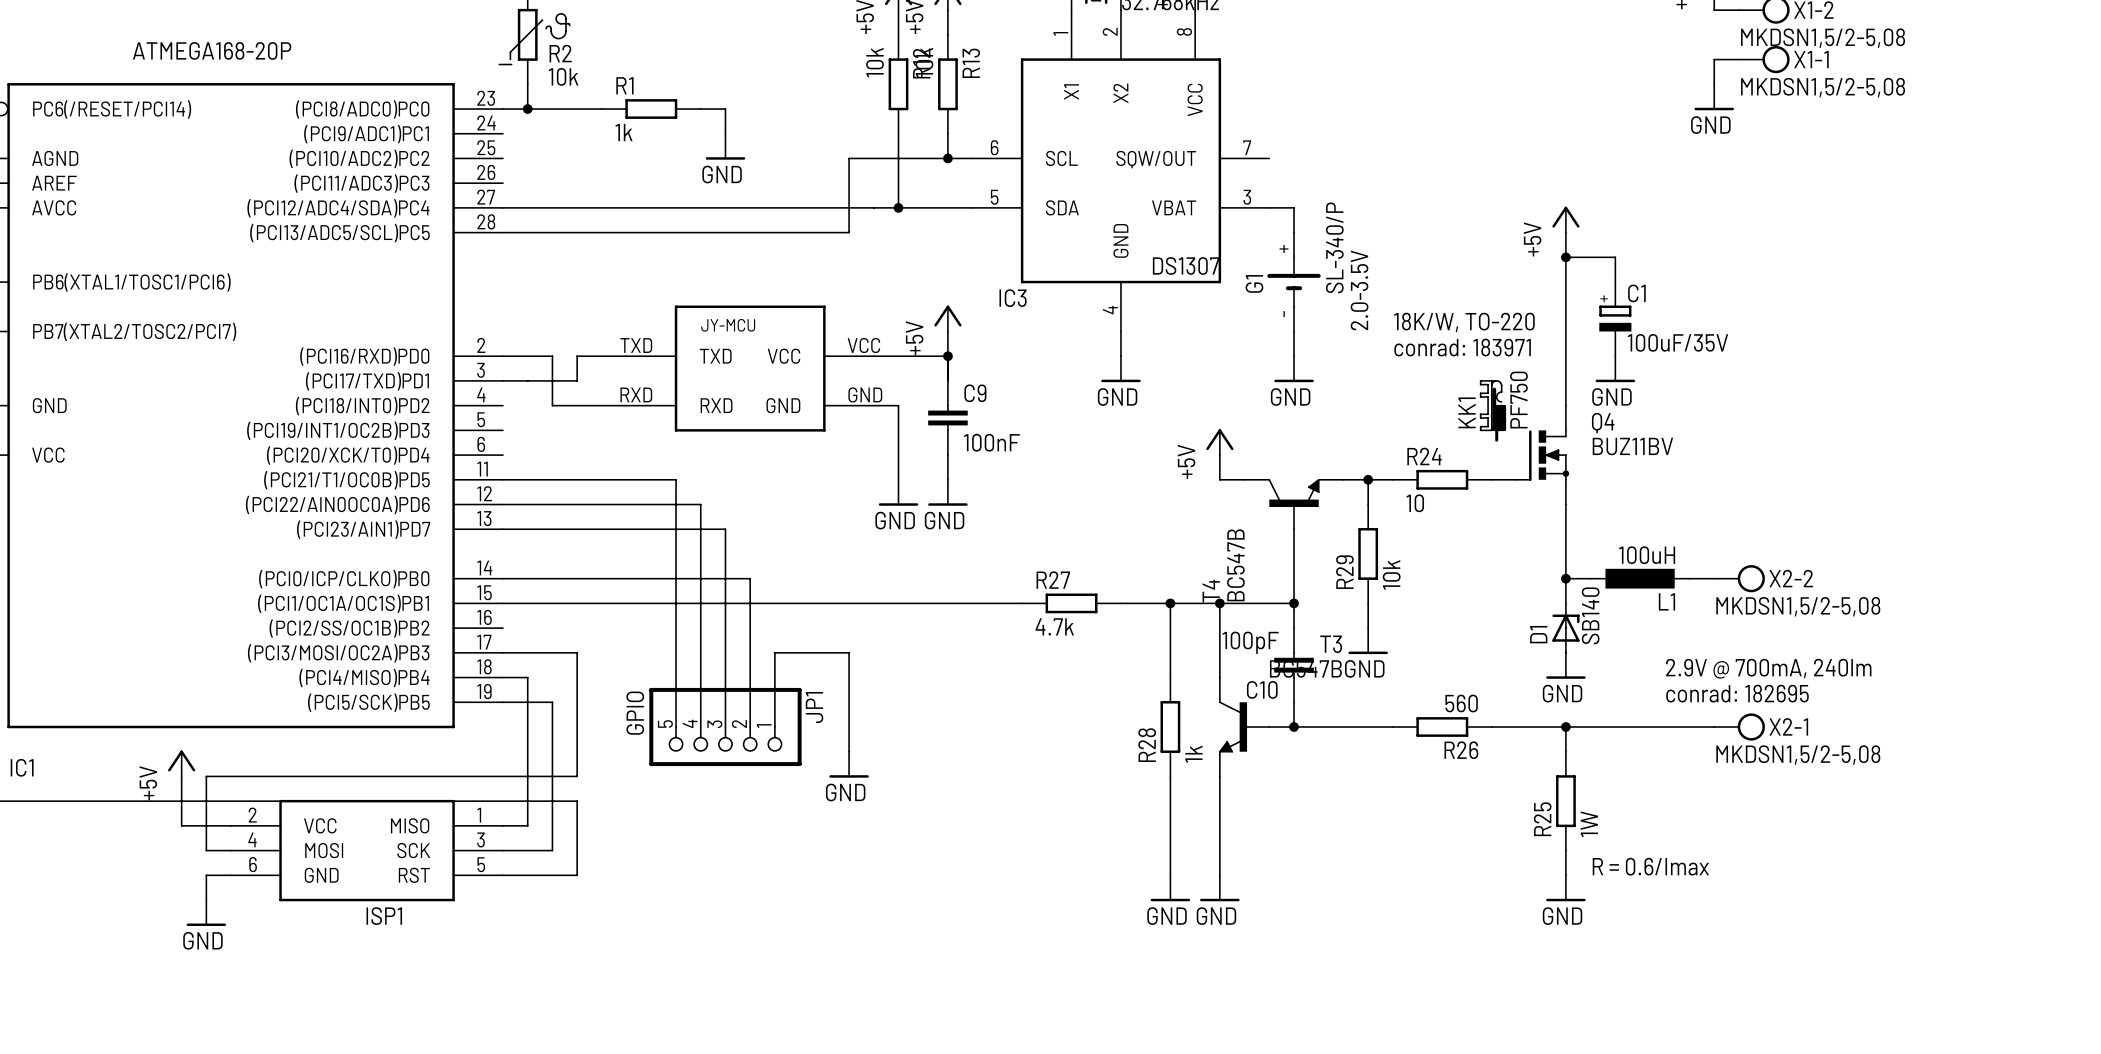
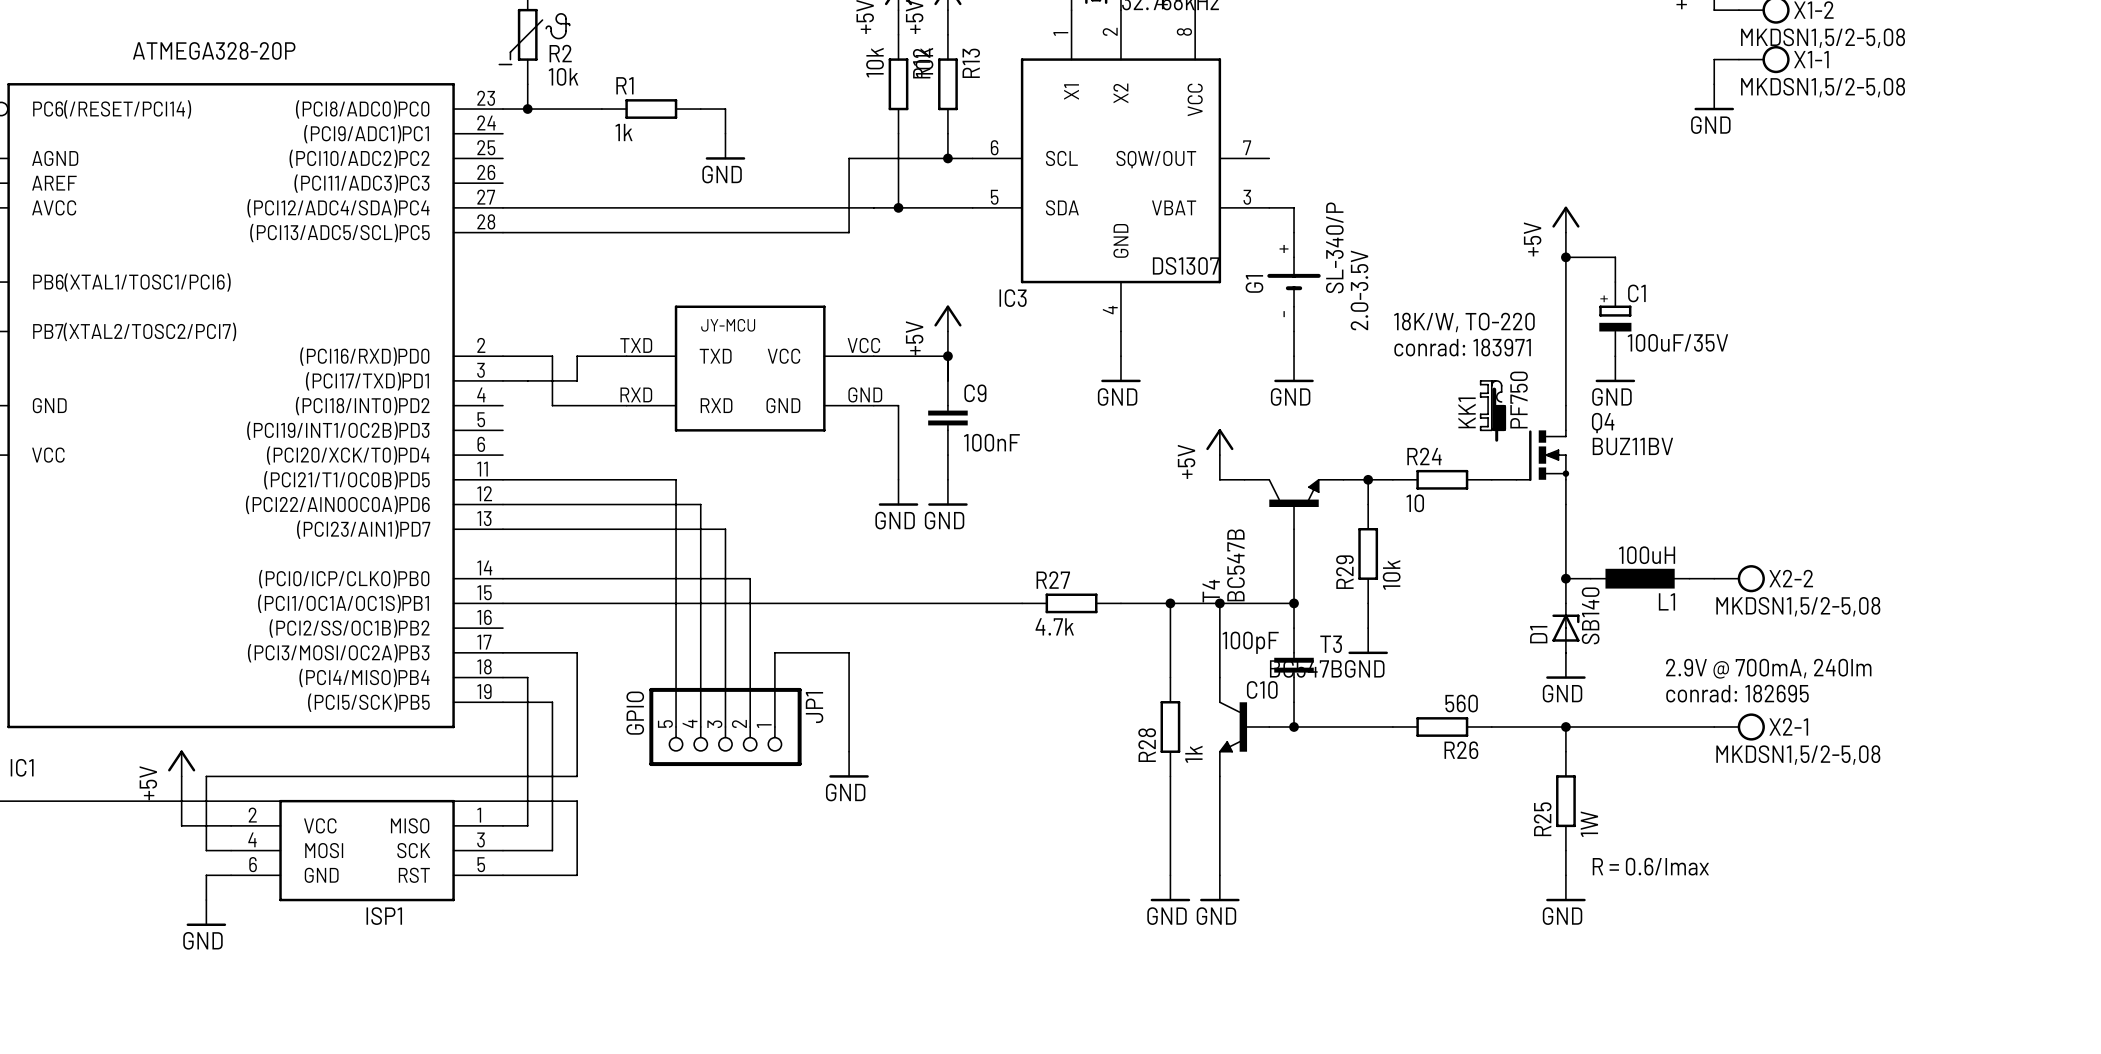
IC1 value: ATMEGA168-20P (212, 50) -> ATMEGA328-20P (214, 50)

